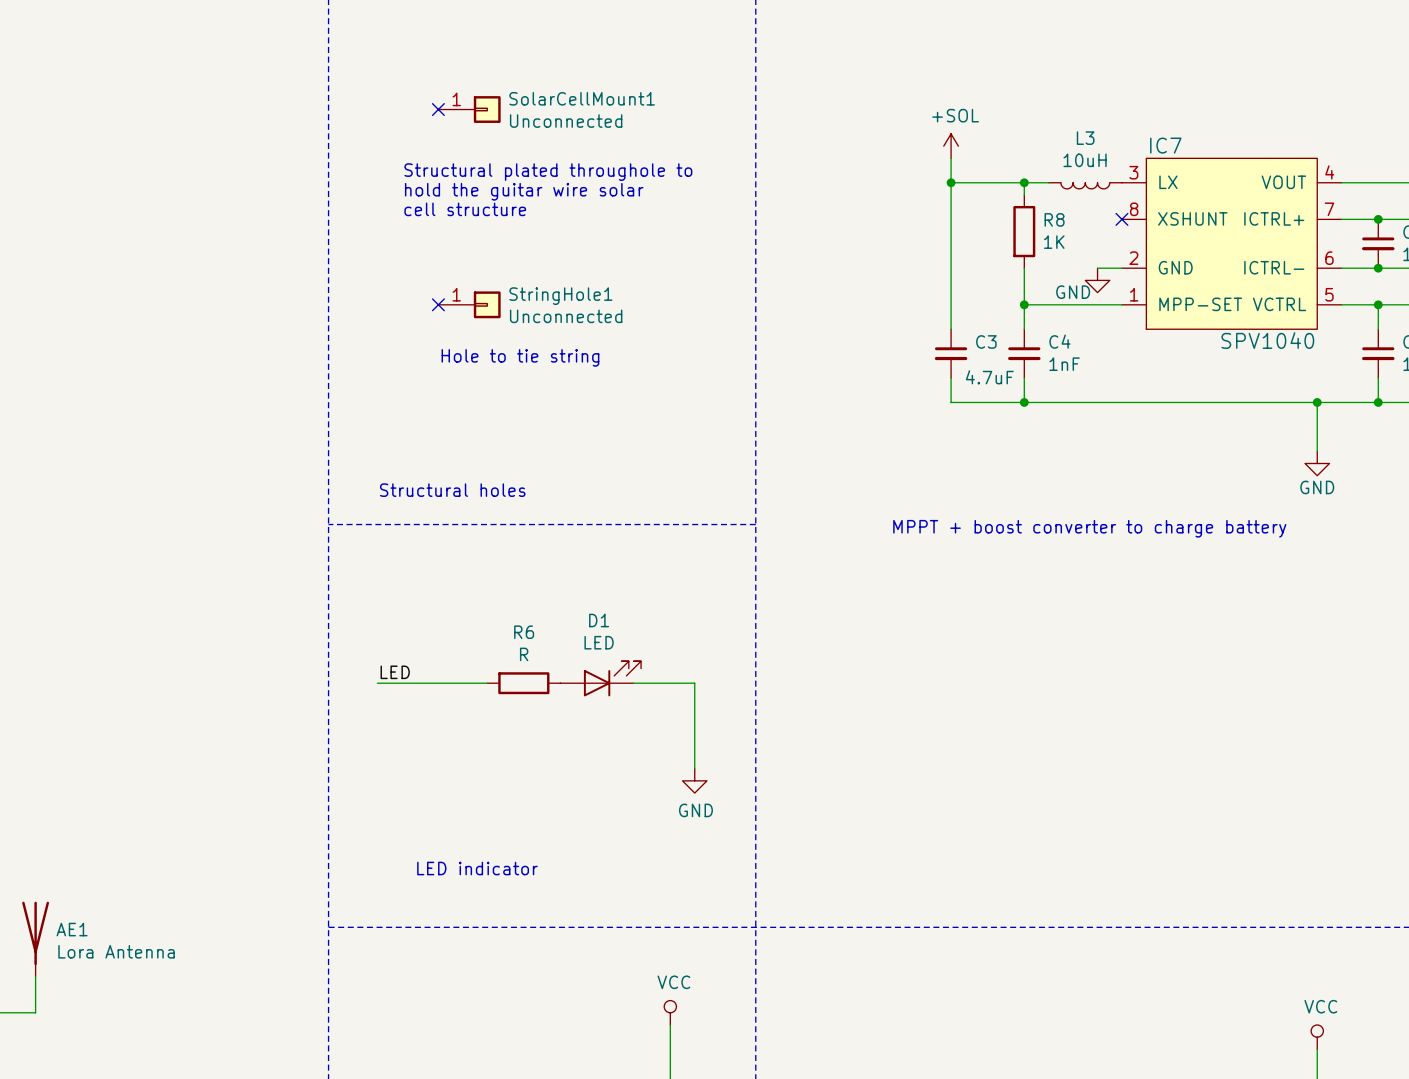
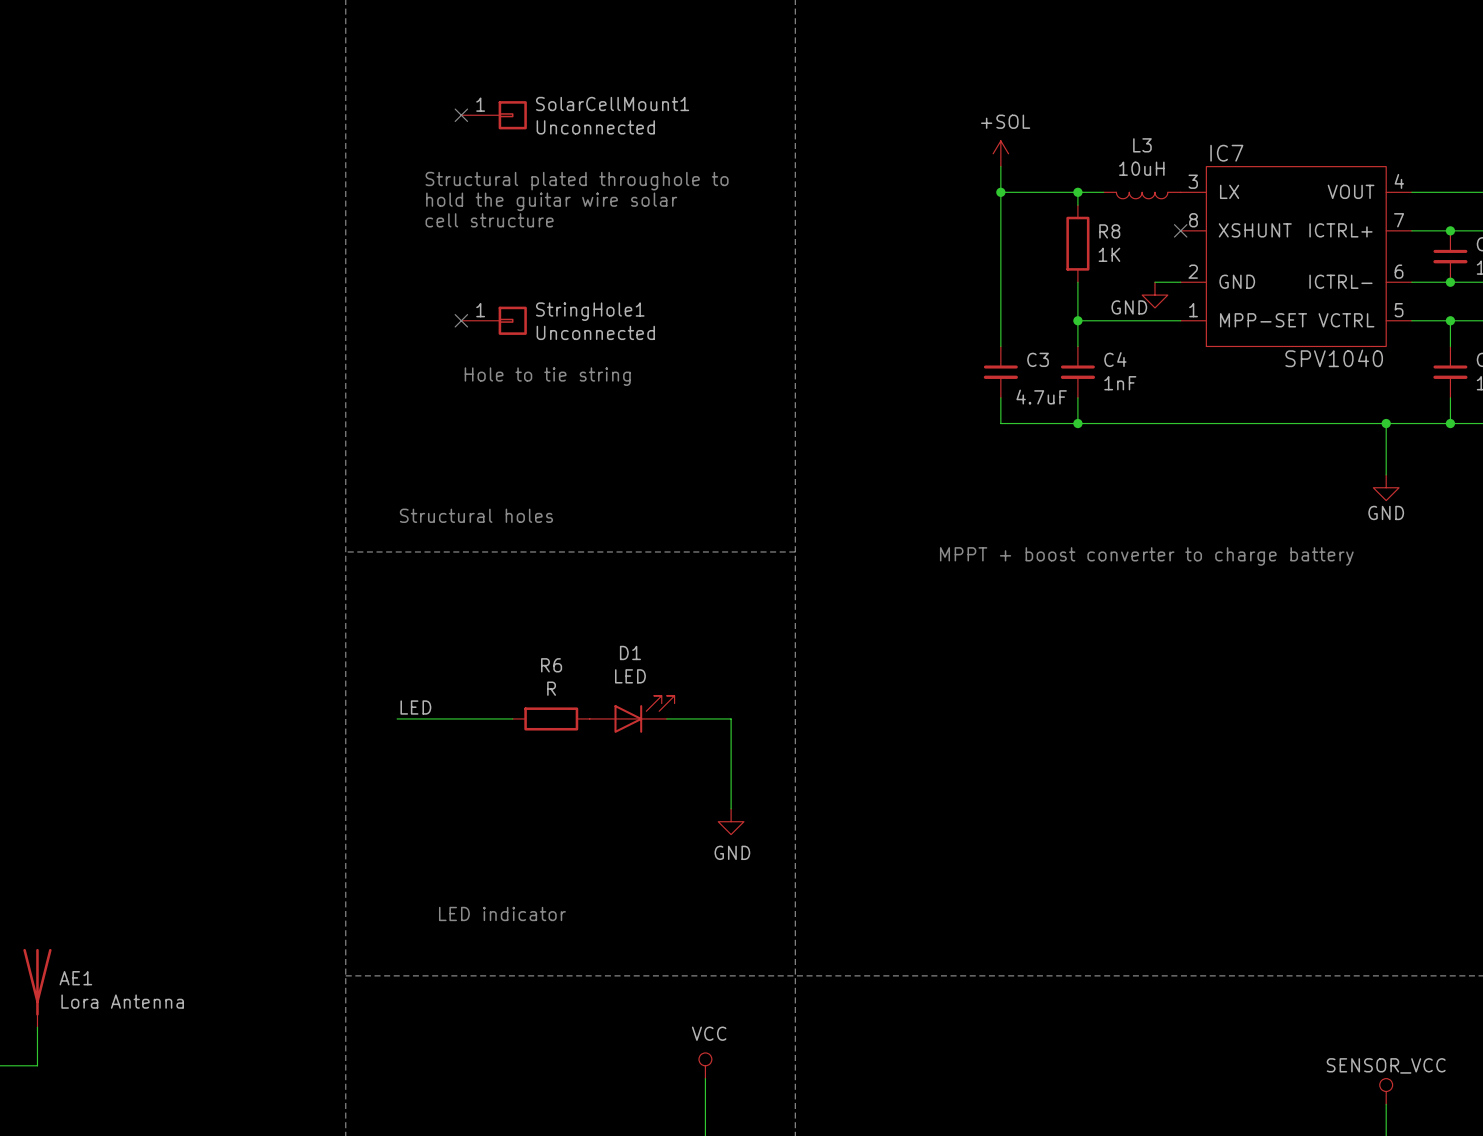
power symbol: VCC (1317, 1037) -> SENSOR_VCC (1386, 1091)

